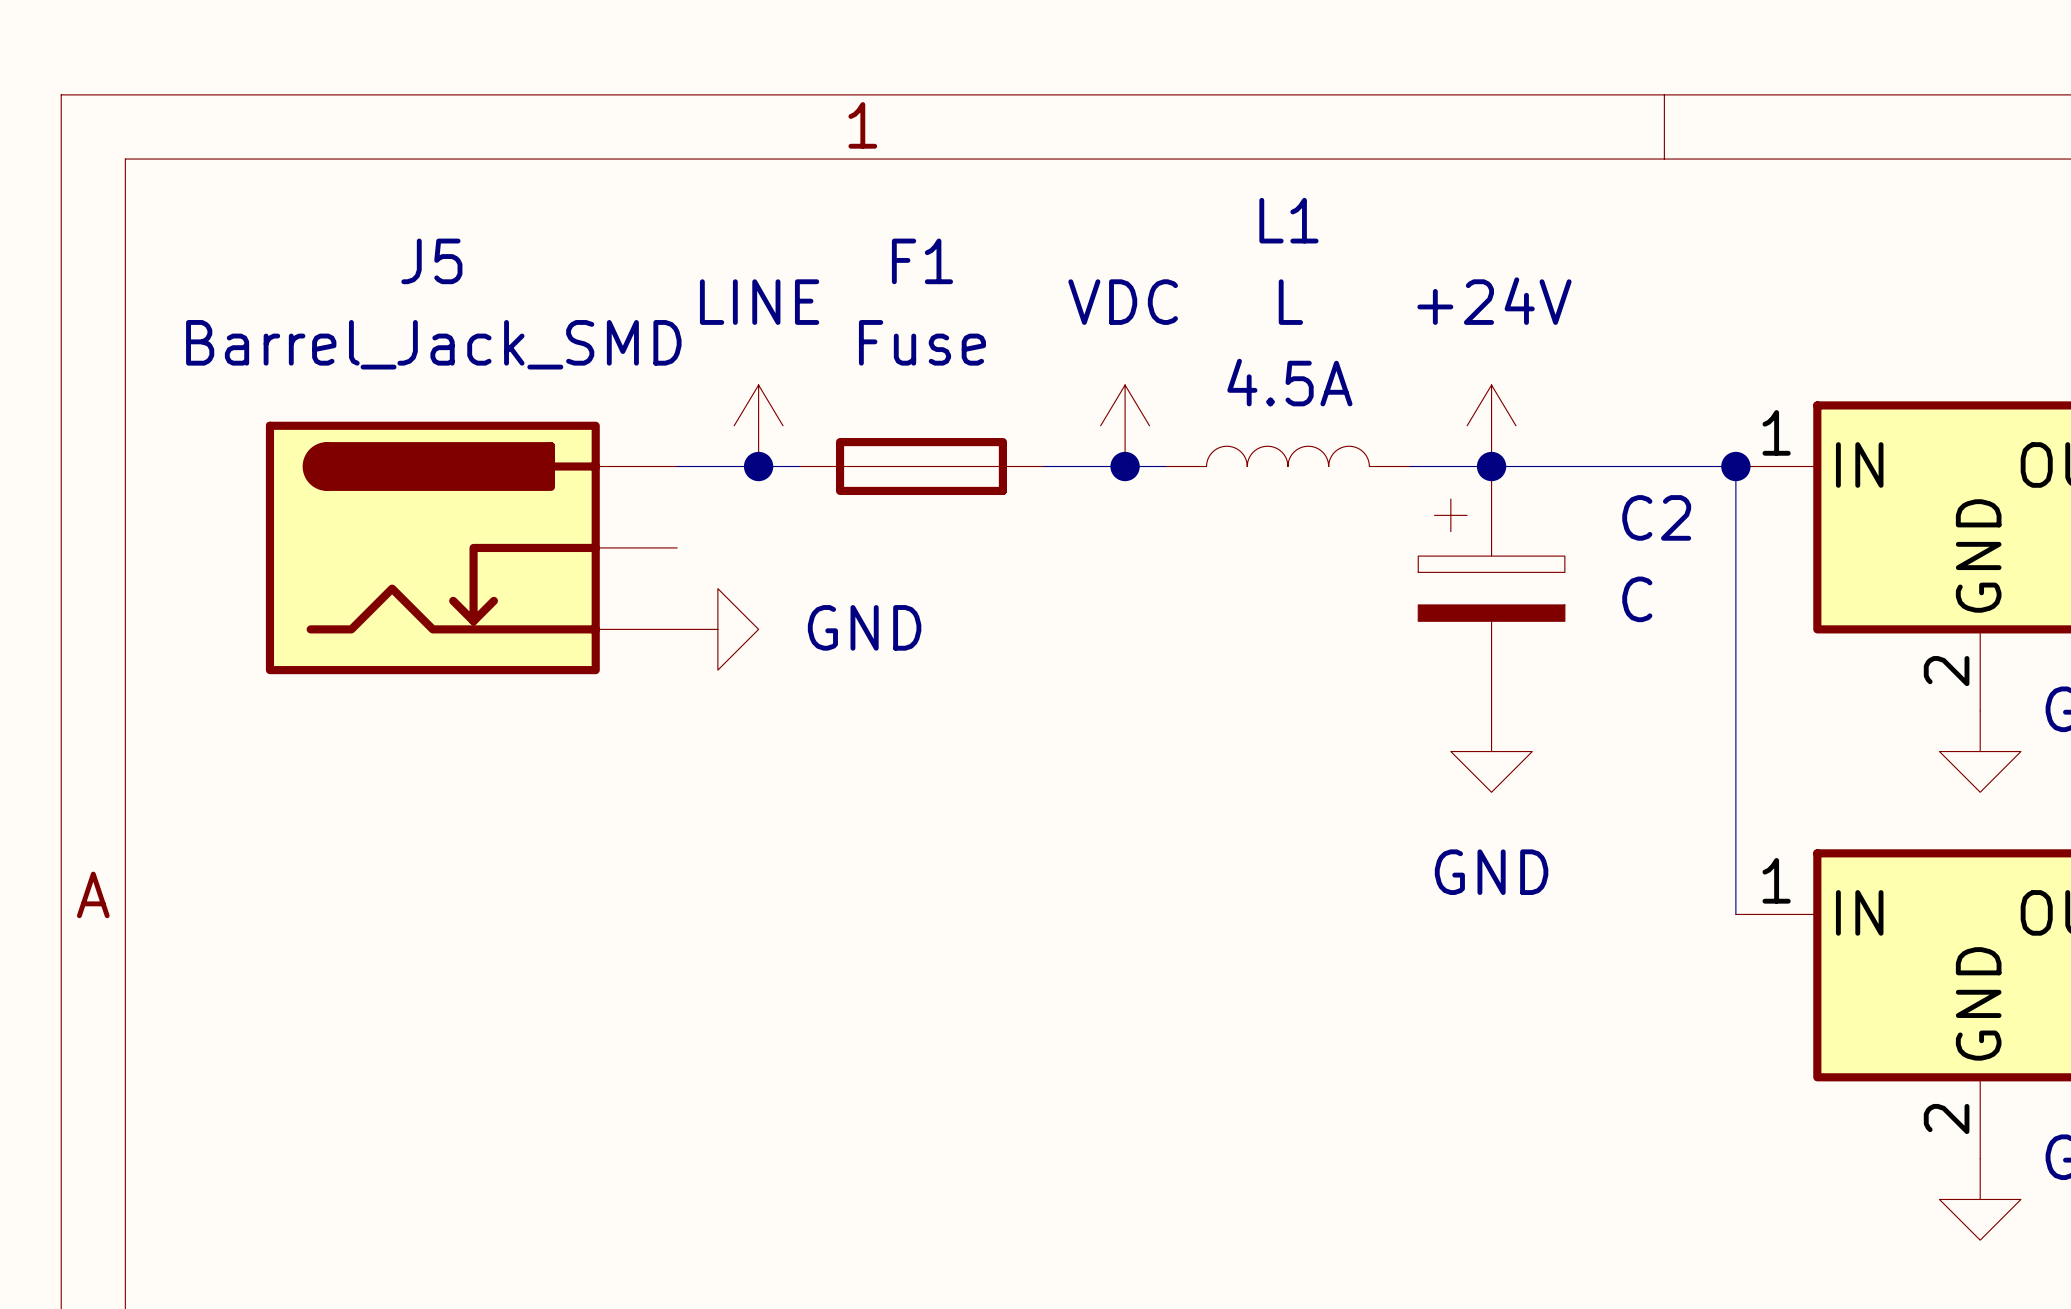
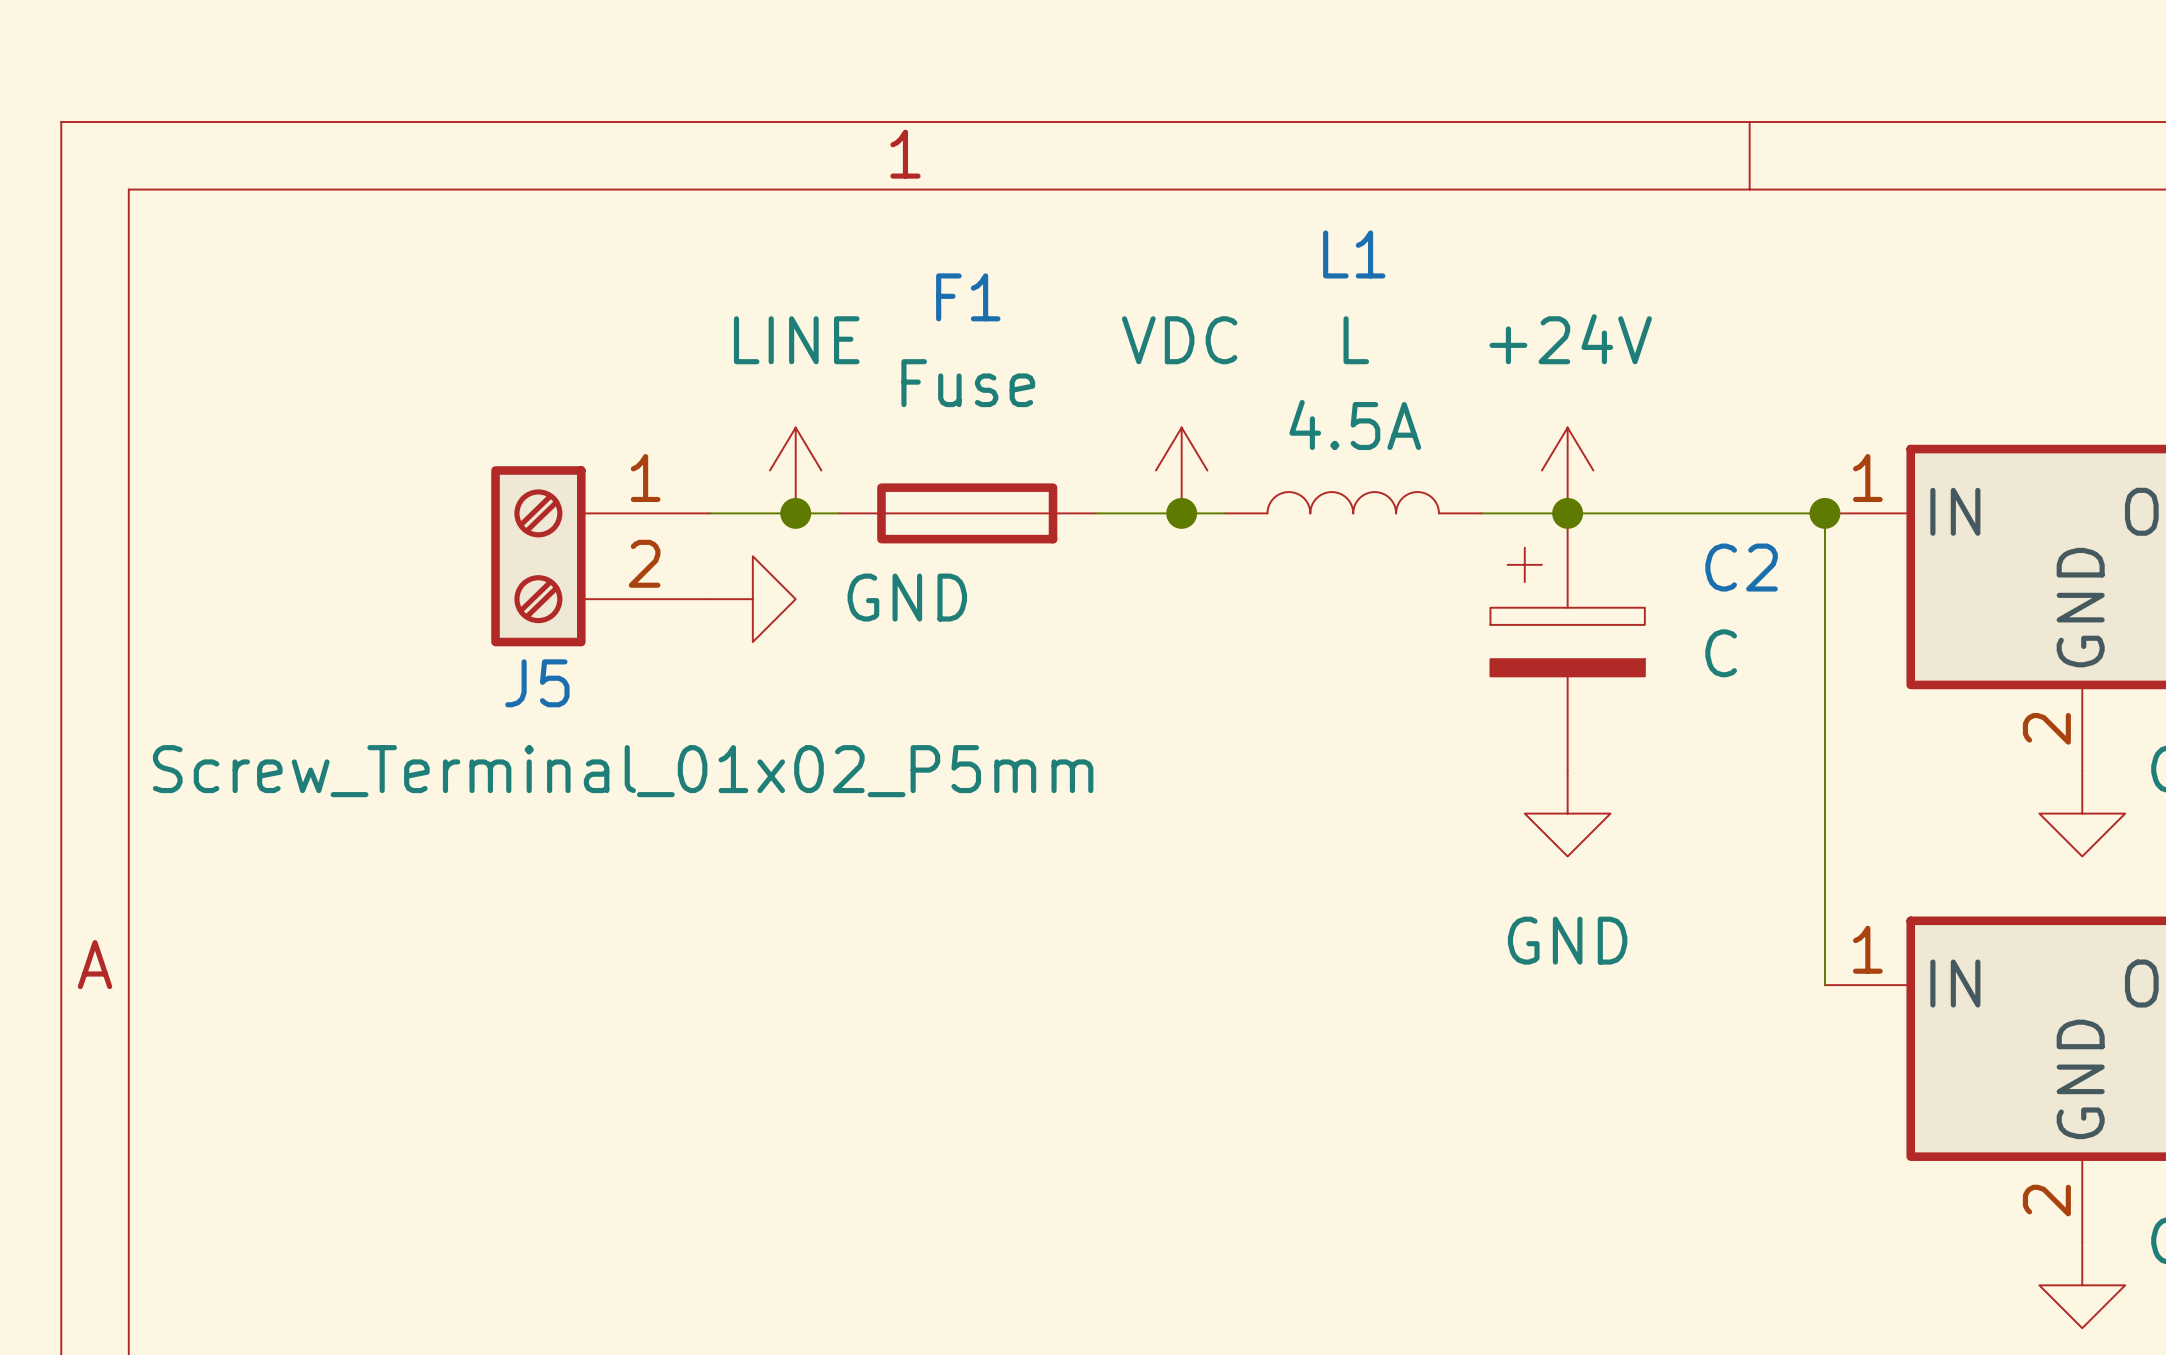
J5 name position: J5 (431, 261) -> J5 (537, 683)
J5 value: Barrel_Jack_SMD (433, 344) -> Screw_Terminal_01x02_P5mm (623, 771)
J5 symbol: [265, 421, 678, 675] -> [491, 466, 710, 647]
power symbol position: GND (717, 629) -> GND (752, 599)

